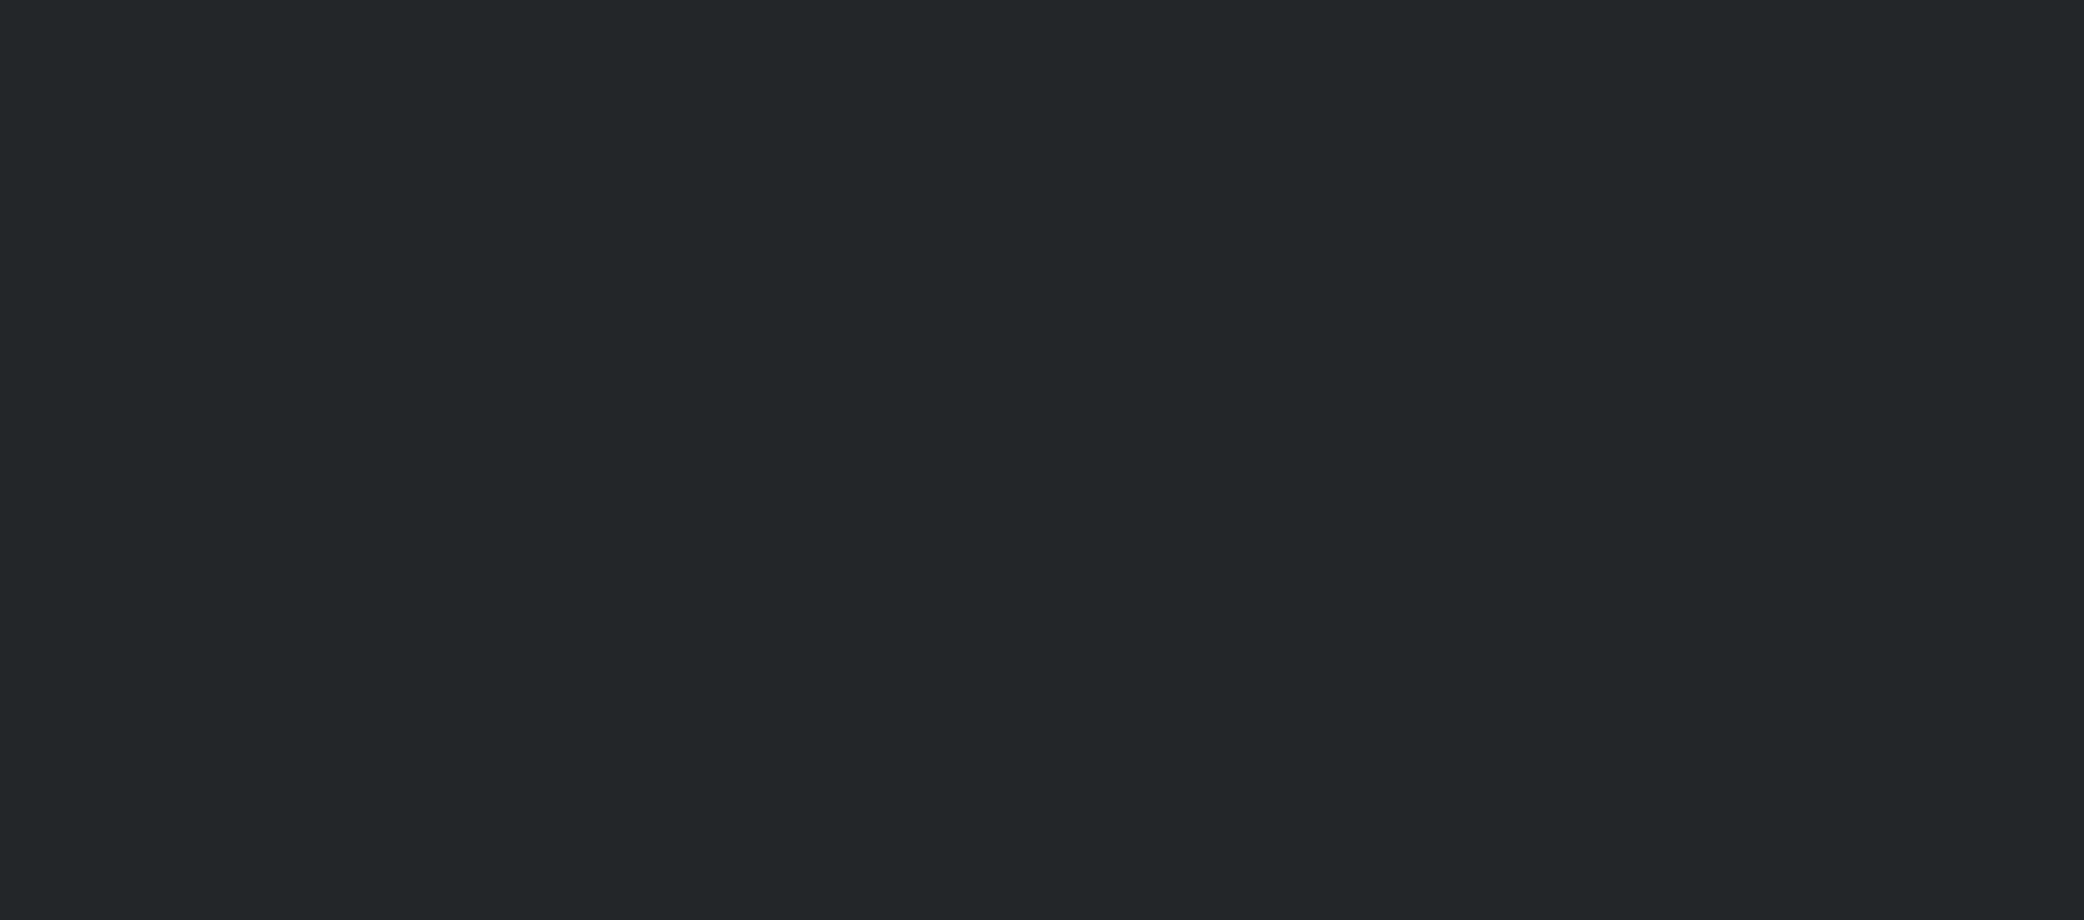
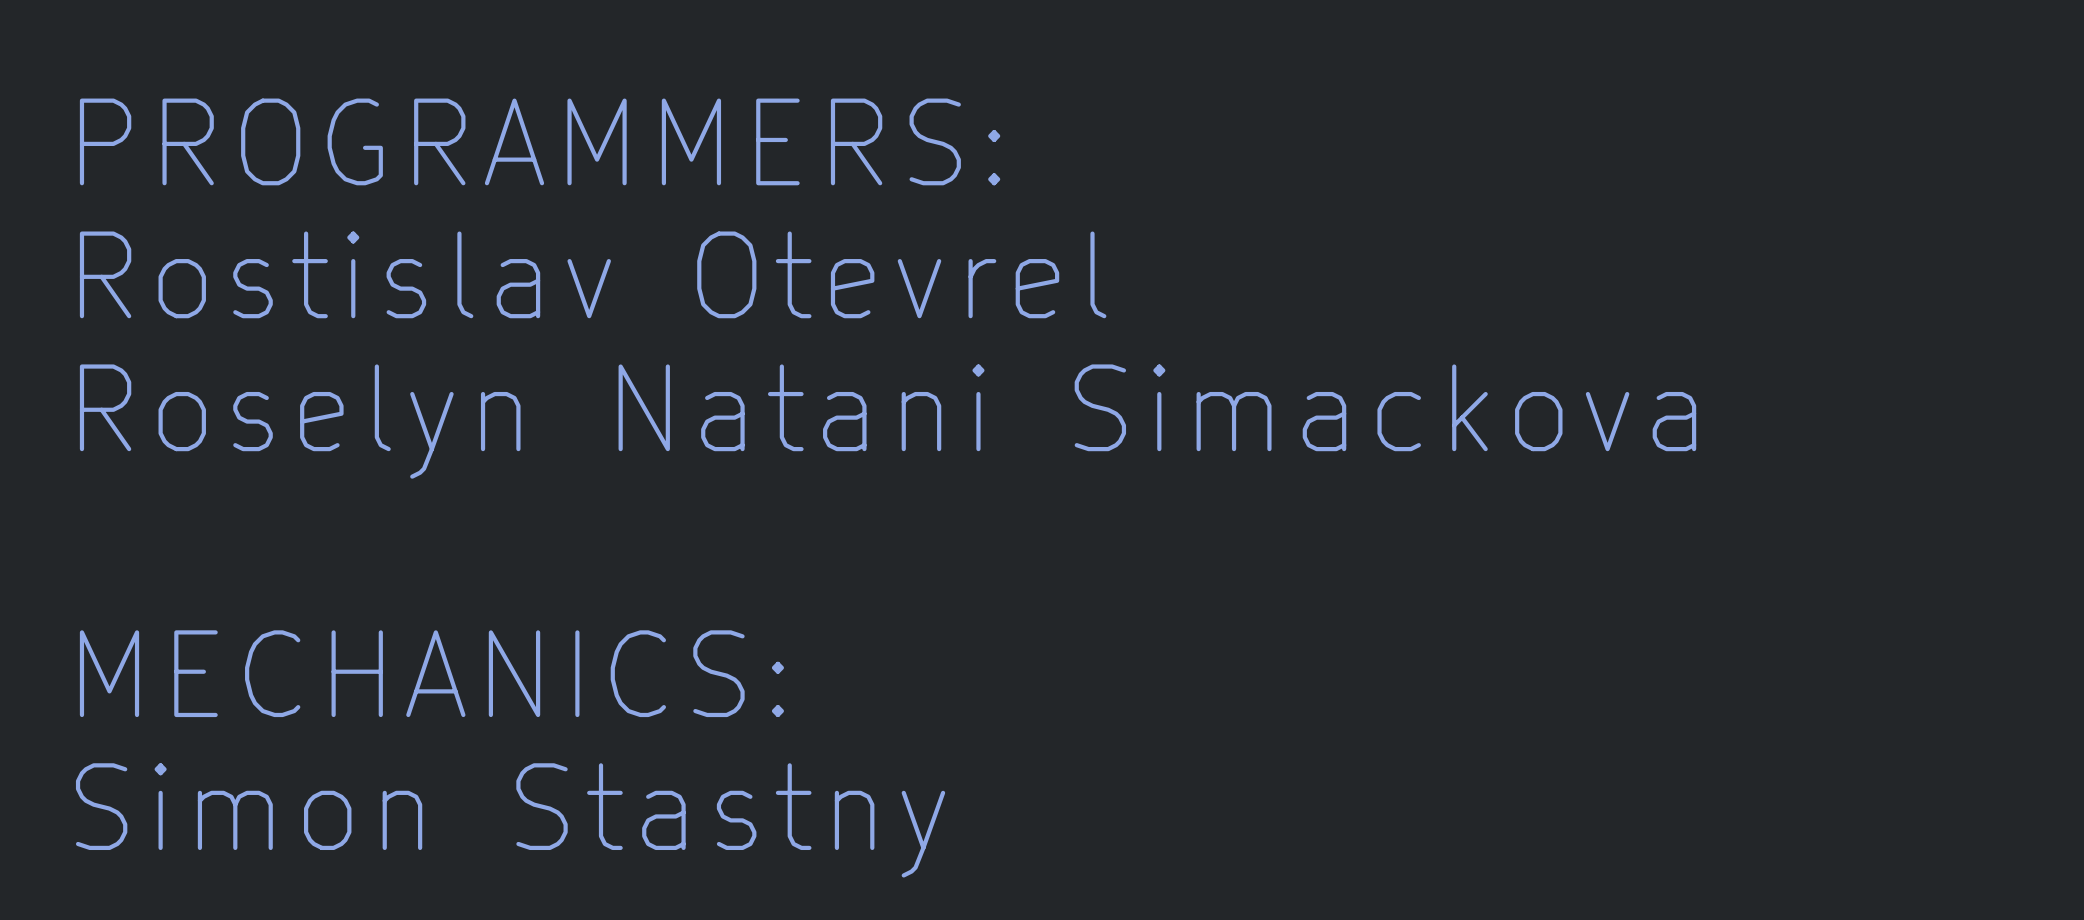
text: none -> PROGRAMMERS: (540, 141)
text: none -> Rostislav Otevrel (593, 274)
text: none -> Roselyn Natani Simackova (888, 421)
text: none -> MECHANICS: (431, 673)
text: none -> Simon Stastny (510, 820)

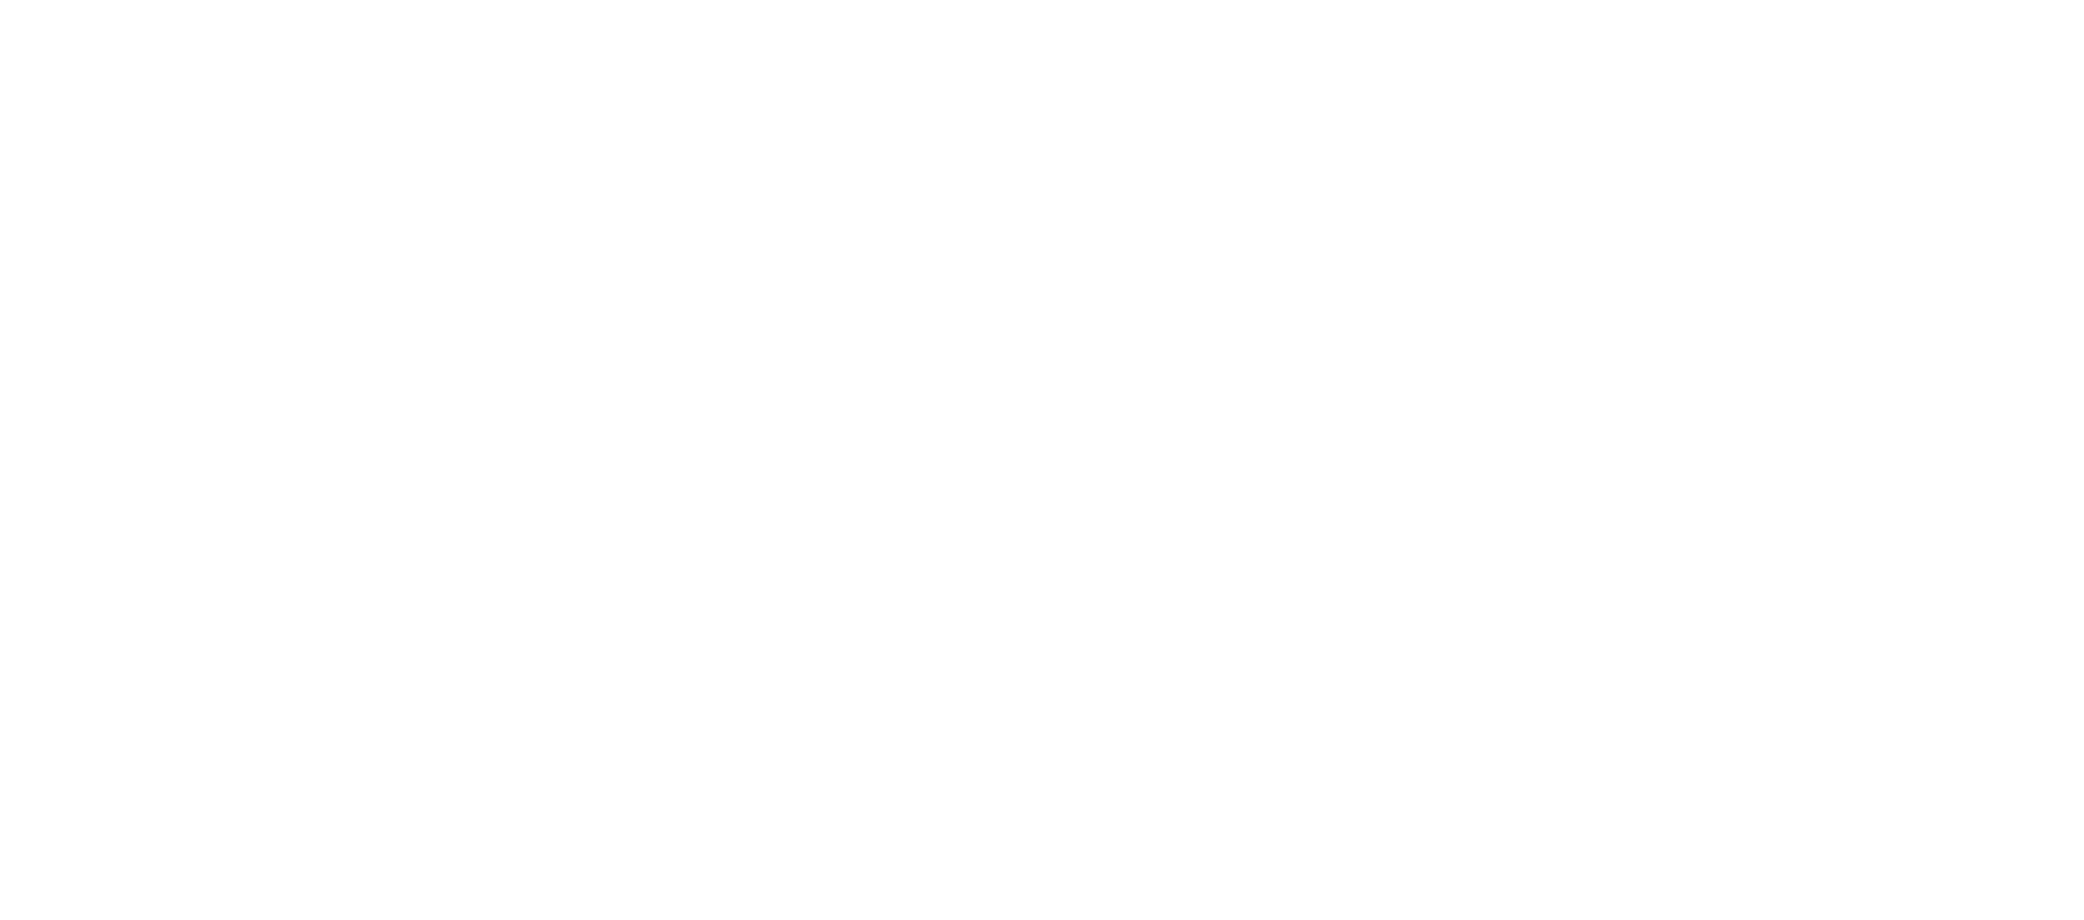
text: PROGRAMMERS: (540, 141) -> none
text: Rostislav Otevrel (593, 274) -> none
text: Roselyn Natani Simackova (888, 421) -> none
text: MECHANICS: (431, 673) -> none
text: Simon Stastny (510, 820) -> none

